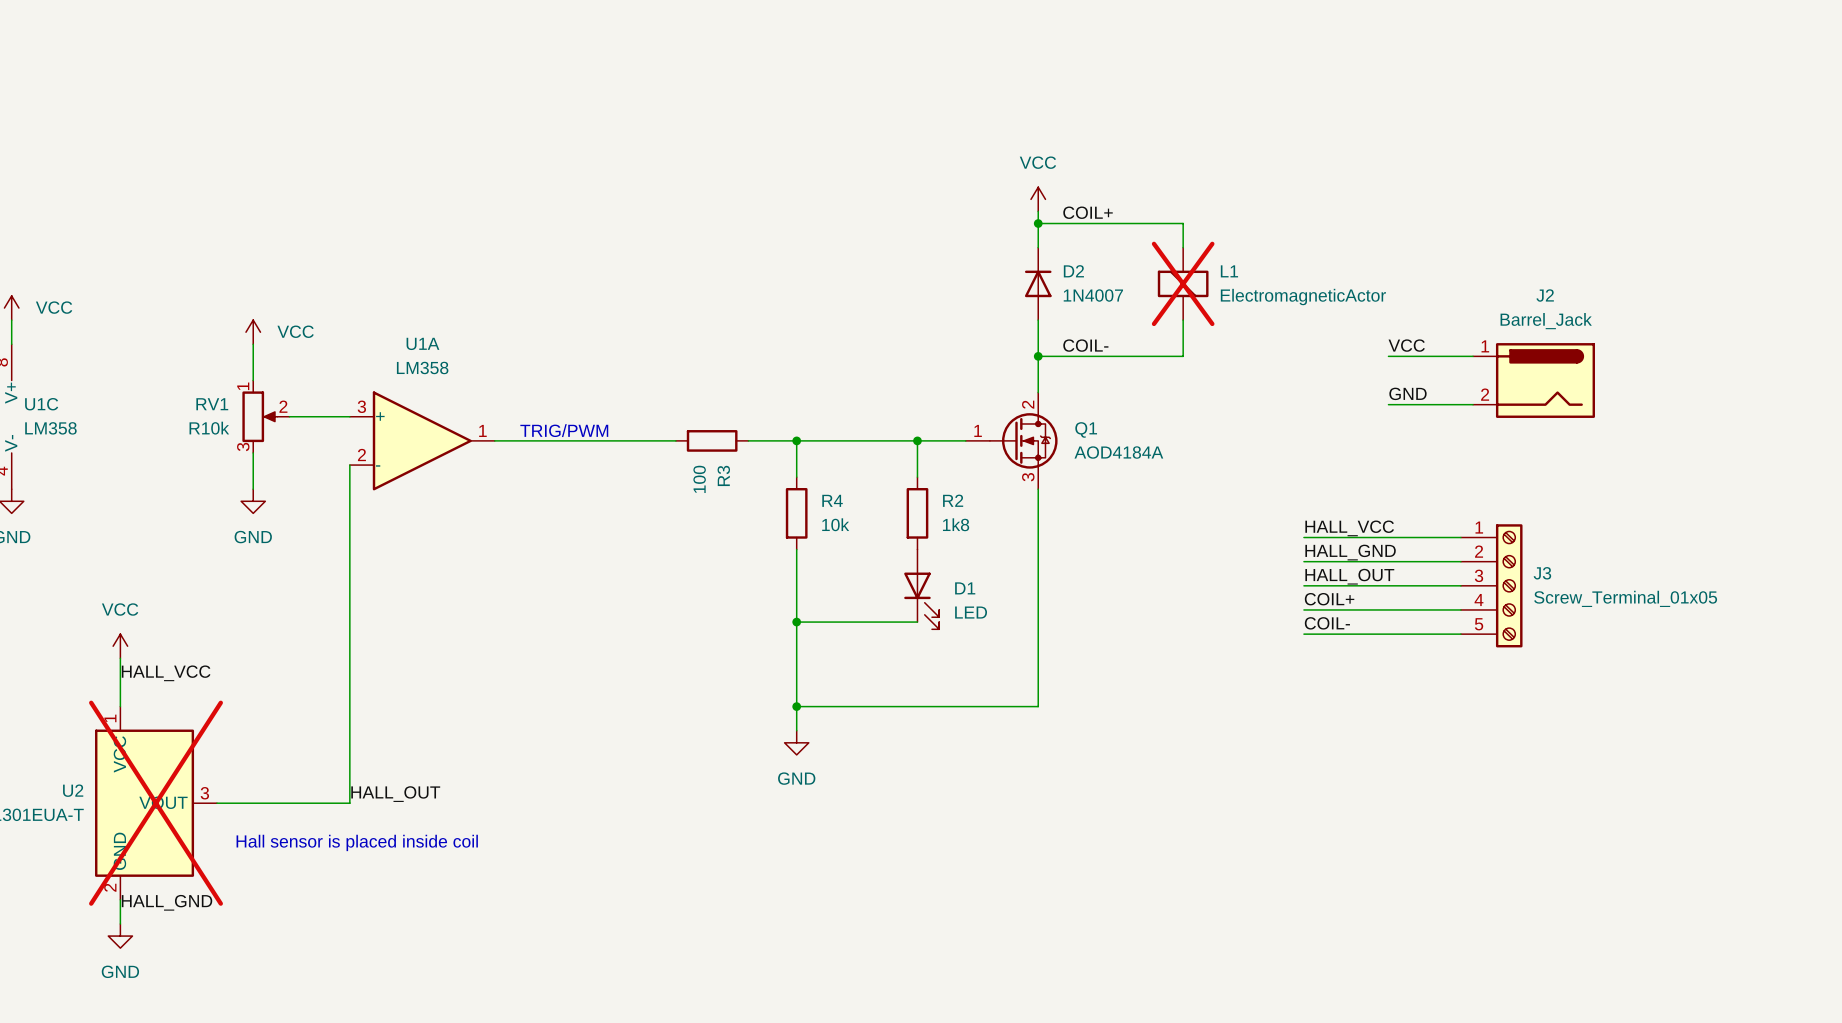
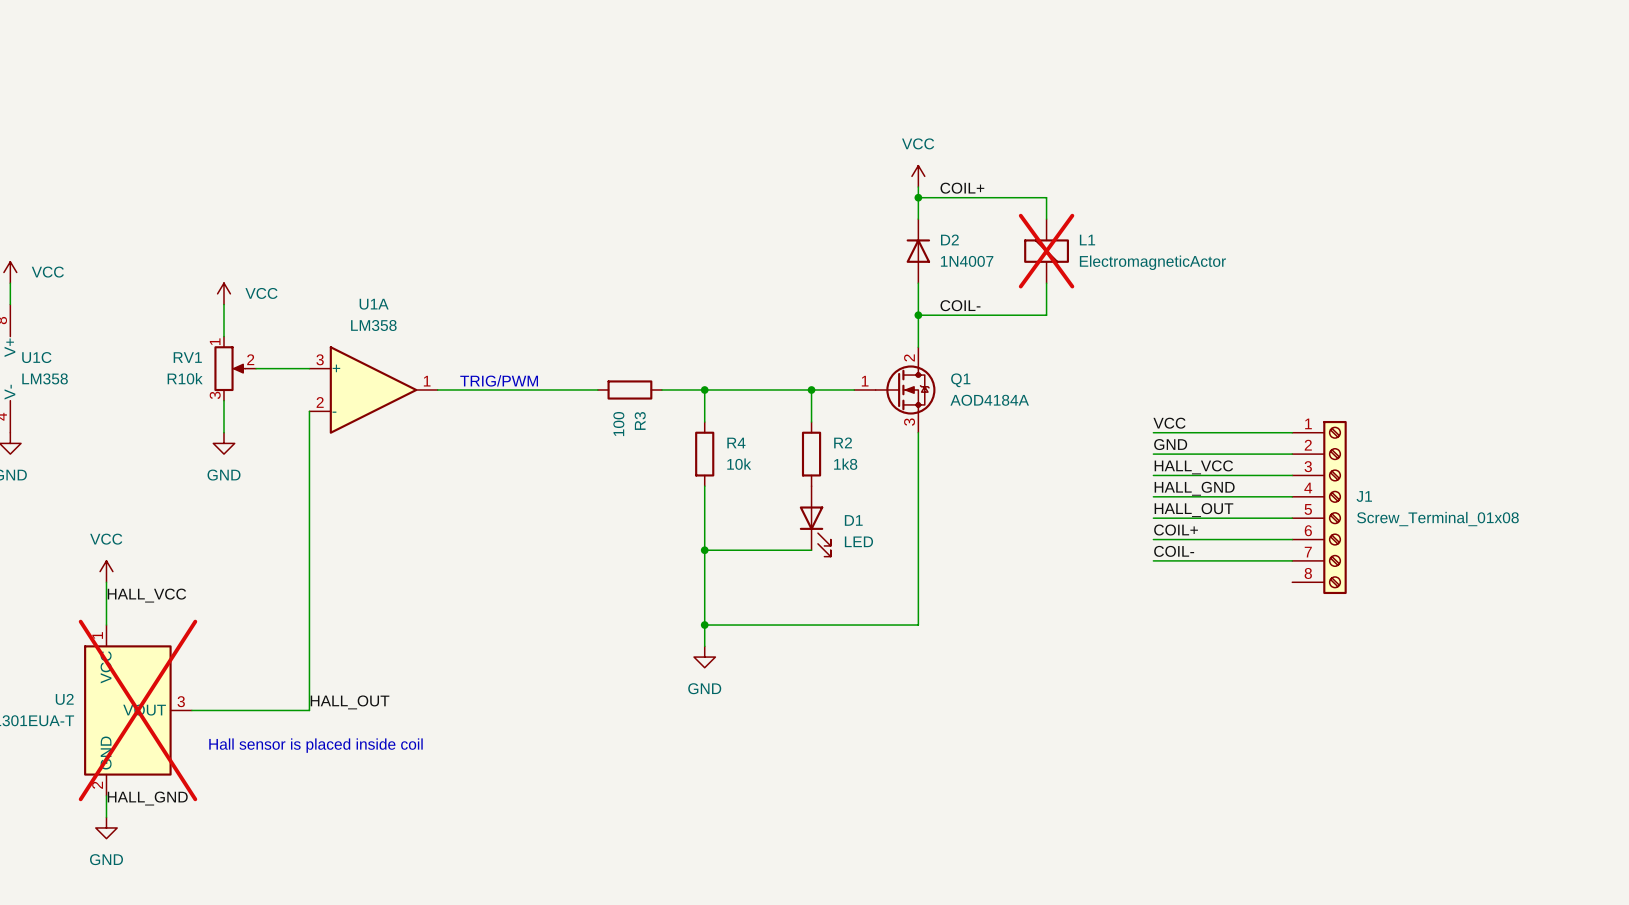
label position: VCC (1406, 345) -> VCC (1169, 423)
wire: (1388, 356) (1473, 356) -> none
J2: Barrel_Jack (1534, 380) -> none
label position: GND (1408, 393) -> GND (1170, 444)
wire: (1388, 404) (1473, 404) -> none
wire: none -> (1153, 432) (1292, 432)
wire: none -> (1153, 454) (1292, 454)
J1: none -> Screw_Terminal_01x08 (1319, 507)
J3: Screw_Terminal_01x05 (1491, 585) -> none

